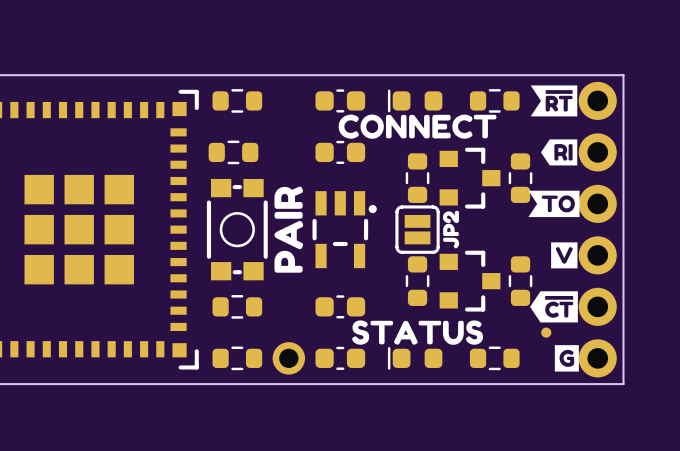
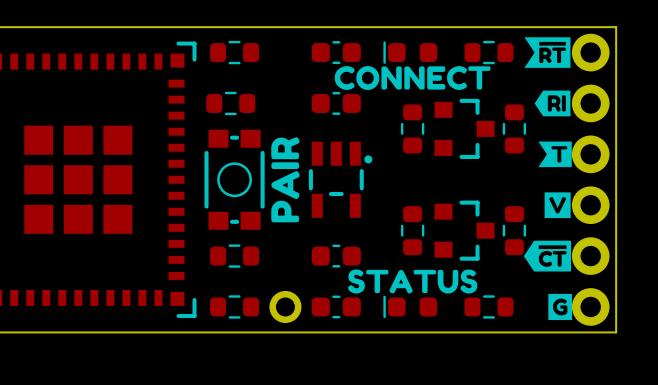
drawing shape: [528, 190, 580, 218] -> [538, 141, 572, 168]
drawing: [442, 210, 460, 249] -> none
part: (417, 229) -> none
part: (546, 332) -> none

